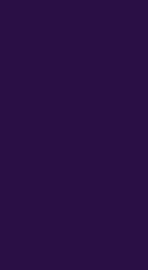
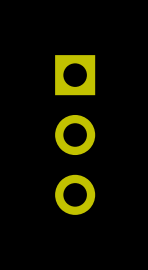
part: none -> (75, 135)

